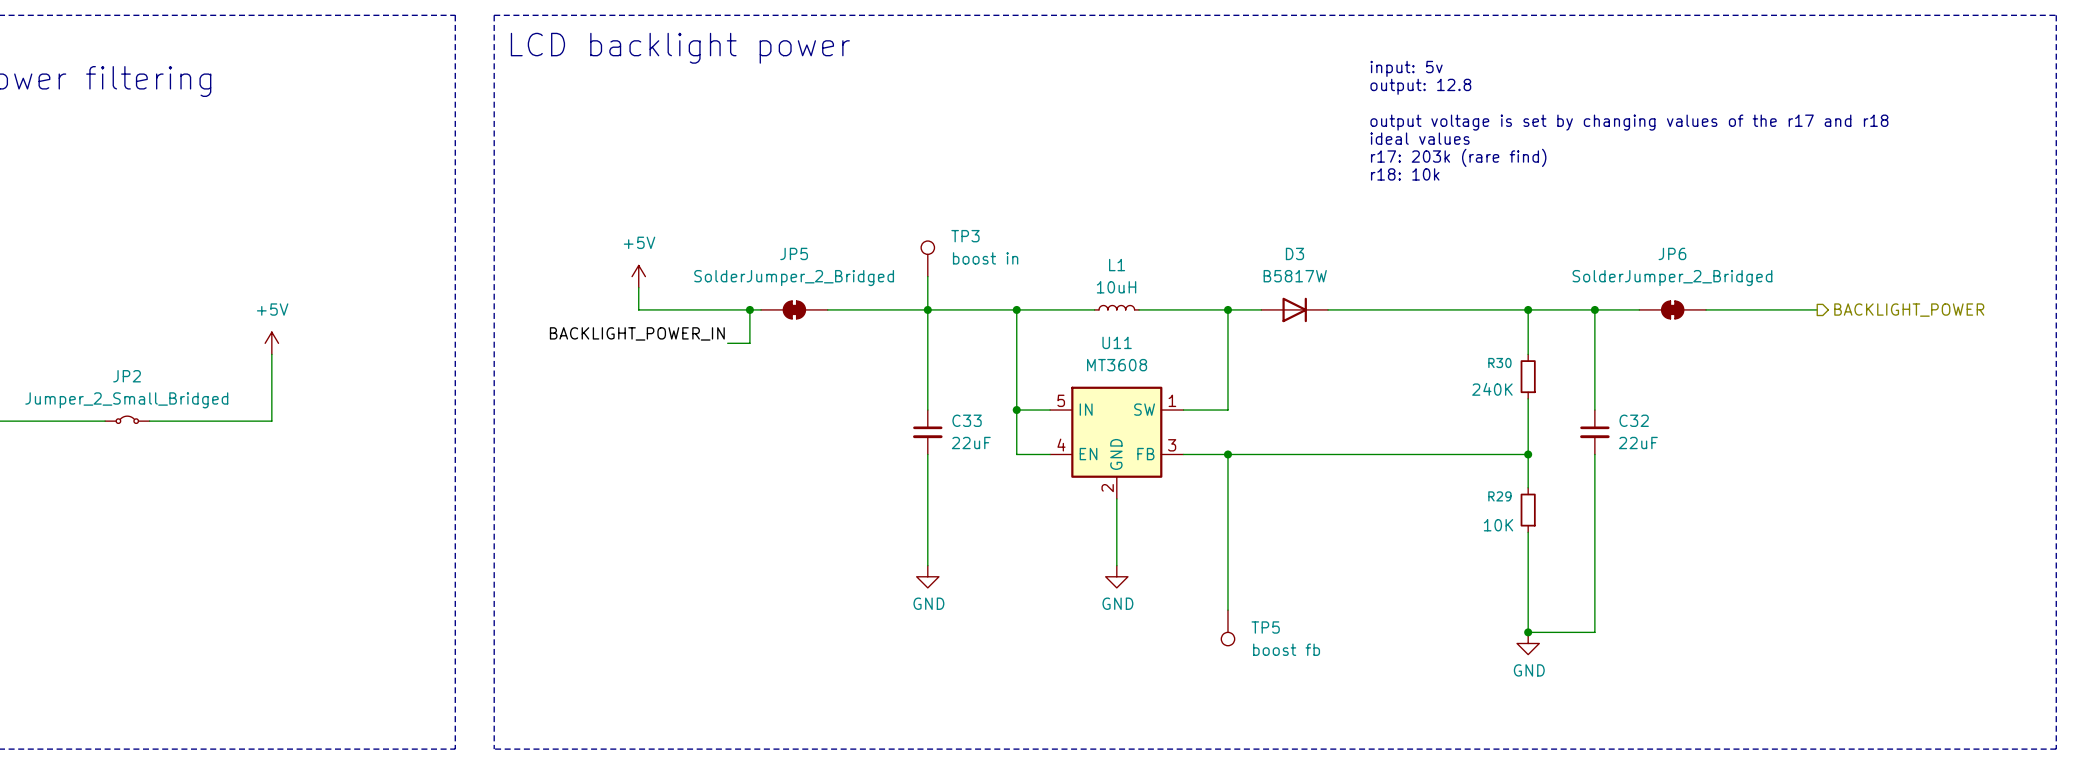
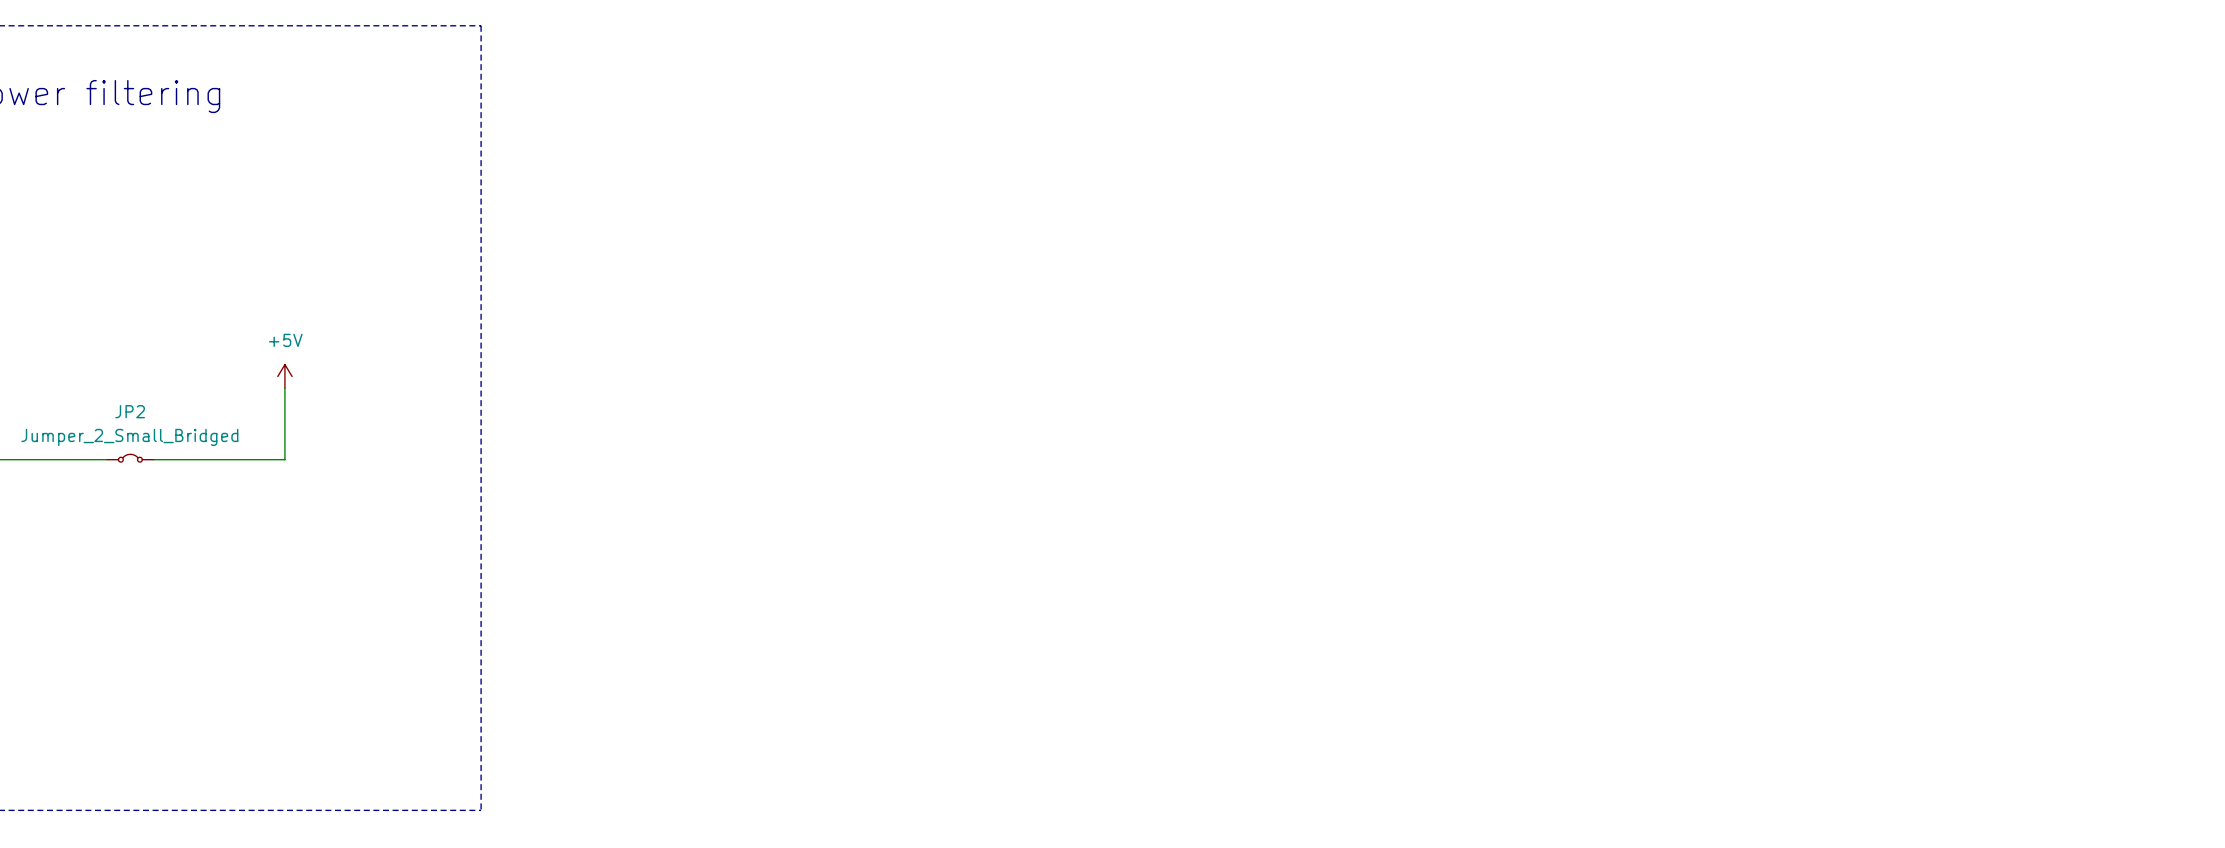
line: (494, 15) (494, 749) (2056, 749) (2056, 15) (494, 15) -> none
text: LCD backlight power (680, 48) -> none
text: input: 5v (1406, 68) -> none
text: output: 12.8 (1420, 86) -> none
text: output voltage is set by changing values of the r17 and r18 (1629, 122) -> none
text: ideal values (1420, 138) -> none
text: r17: 203k (rare find) (1458, 157) -> none
text: r18: 10k (1405, 174) -> none
TP3: boost in (927, 258) -> none
power symbol: +5V (638, 276) -> none
wire: (927, 276) (927, 410) -> none
wire: (638, 287) (638, 309) (761, 309) -> none
L1: 10uH (1116, 307) -> none
wire: (749, 309) (749, 343) (727, 343) -> none
junction: (749, 309) -> none
JP5: SolderJumper_2_Bridged (794, 309) -> none
wire: (827, 309) (1094, 309) -> none
junction: (927, 309) -> none
wire: (1016, 309) (1016, 454) (1050, 454) -> none
junction: (1016, 309) -> none
wire: (1139, 309) (1261, 309) -> none
wire: (1227, 309) (1227, 410) (1183, 410) -> none
junction: (1227, 309) -> none
D3: B5817W (1294, 309) -> none
wire: (1328, 309) (1639, 309) -> none
wire: (1528, 309) (1528, 354) -> none
junction: (1528, 309) -> none
wire: (1594, 309) (1594, 410) -> none
junction: (1594, 309) -> none
JP6: SolderJumper_2_Bridged (1672, 309) -> none
wire: (1706, 309) (1817, 309) -> none
hierarchical label: BACKLIGHT_POWER (1909, 310) -> none
label: BACKLIGHT_POWER_IN (637, 333) -> none
R30: 240K (1528, 376) -> none
wire: (1528, 398) (1528, 487) -> none
wire: (1016, 410) (1050, 410) -> none
junction: (1016, 410) -> none
C33: 22uF (927, 432) -> none
C32: 22uF (1594, 432) -> none
U11: MT3608 (1116, 442) -> none
wire: (927, 454) (927, 565) -> none
wire: (1183, 454) (1528, 454) -> none
wire: (1227, 454) (1227, 610) -> none
junction: (1227, 454) -> none
junction: (1528, 454) -> none
wire: (1594, 454) (1594, 632) (1528, 632) (1528, 532) -> none
wire: (1116, 498) (1116, 565) -> none
R29: 10K (1528, 510) -> none
power symbol: GND (927, 576) -> none
power symbol: GND (1116, 576) -> none
TP5: boost fb (1227, 627) -> none
junction: (1528, 632) -> none
power symbol: GND (1528, 643) -> none

